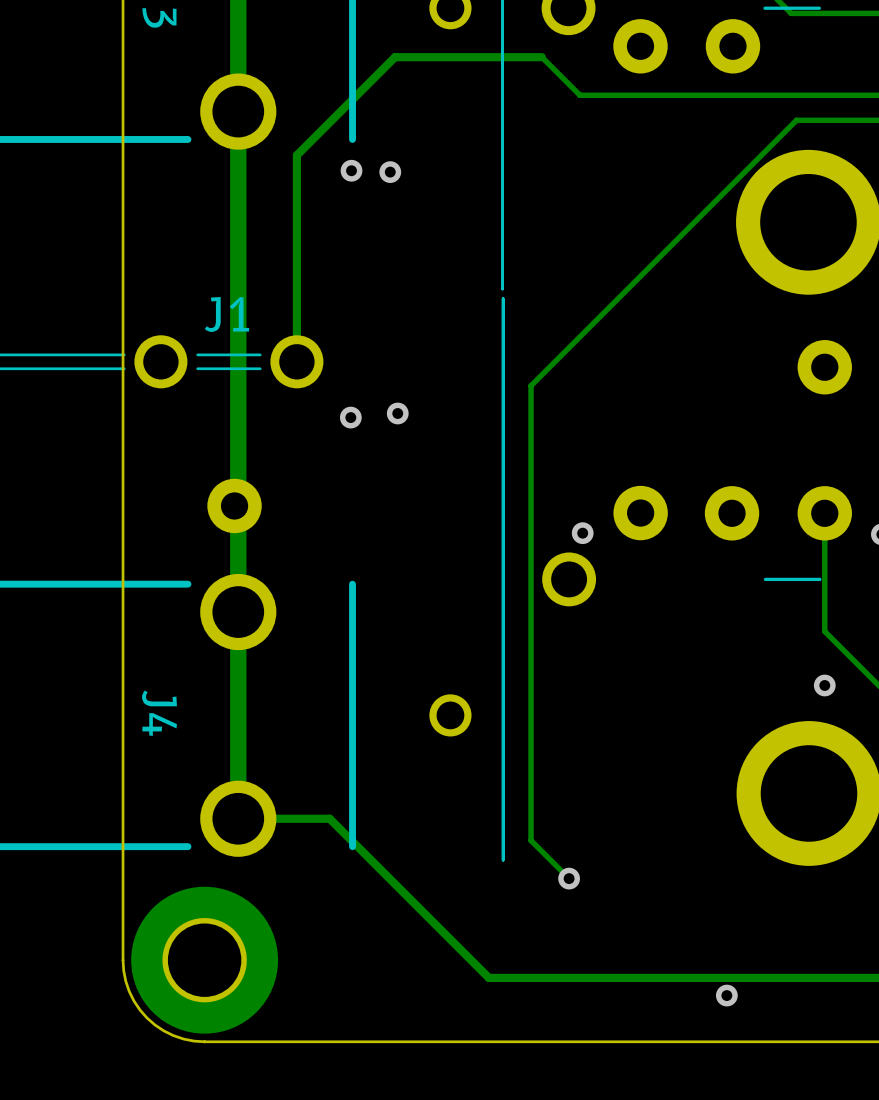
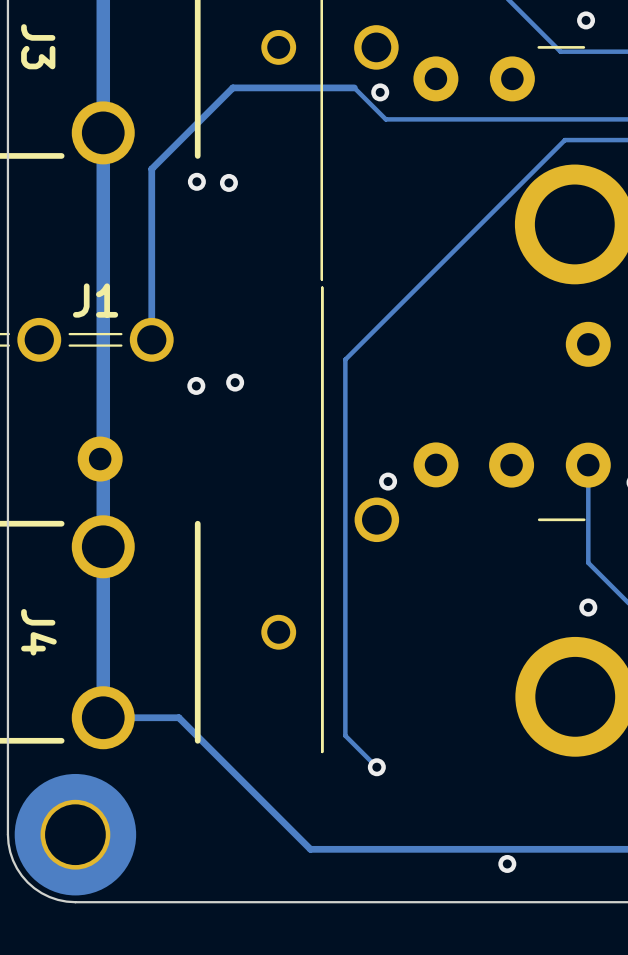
via: none -> (380, 92)

